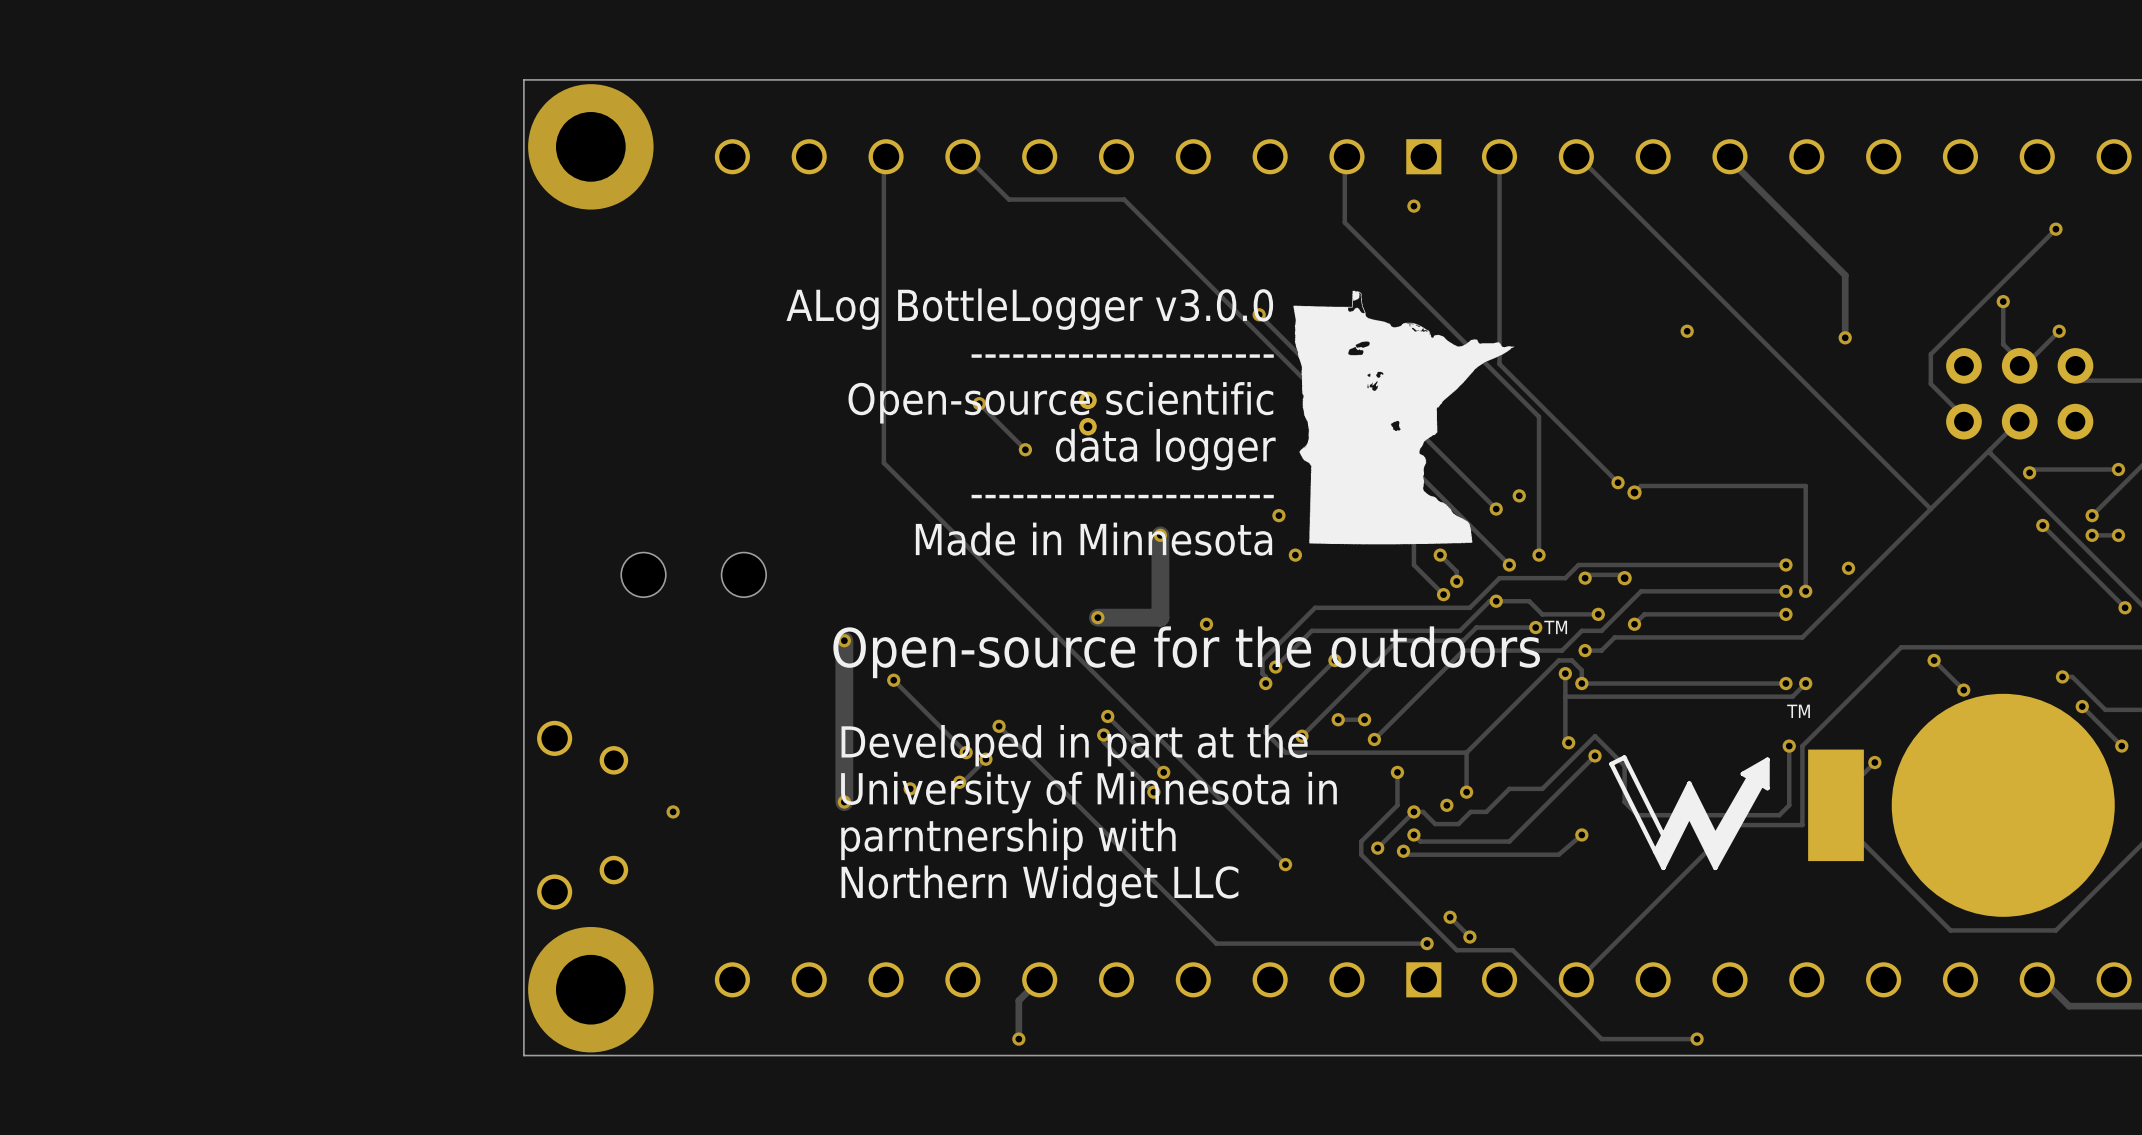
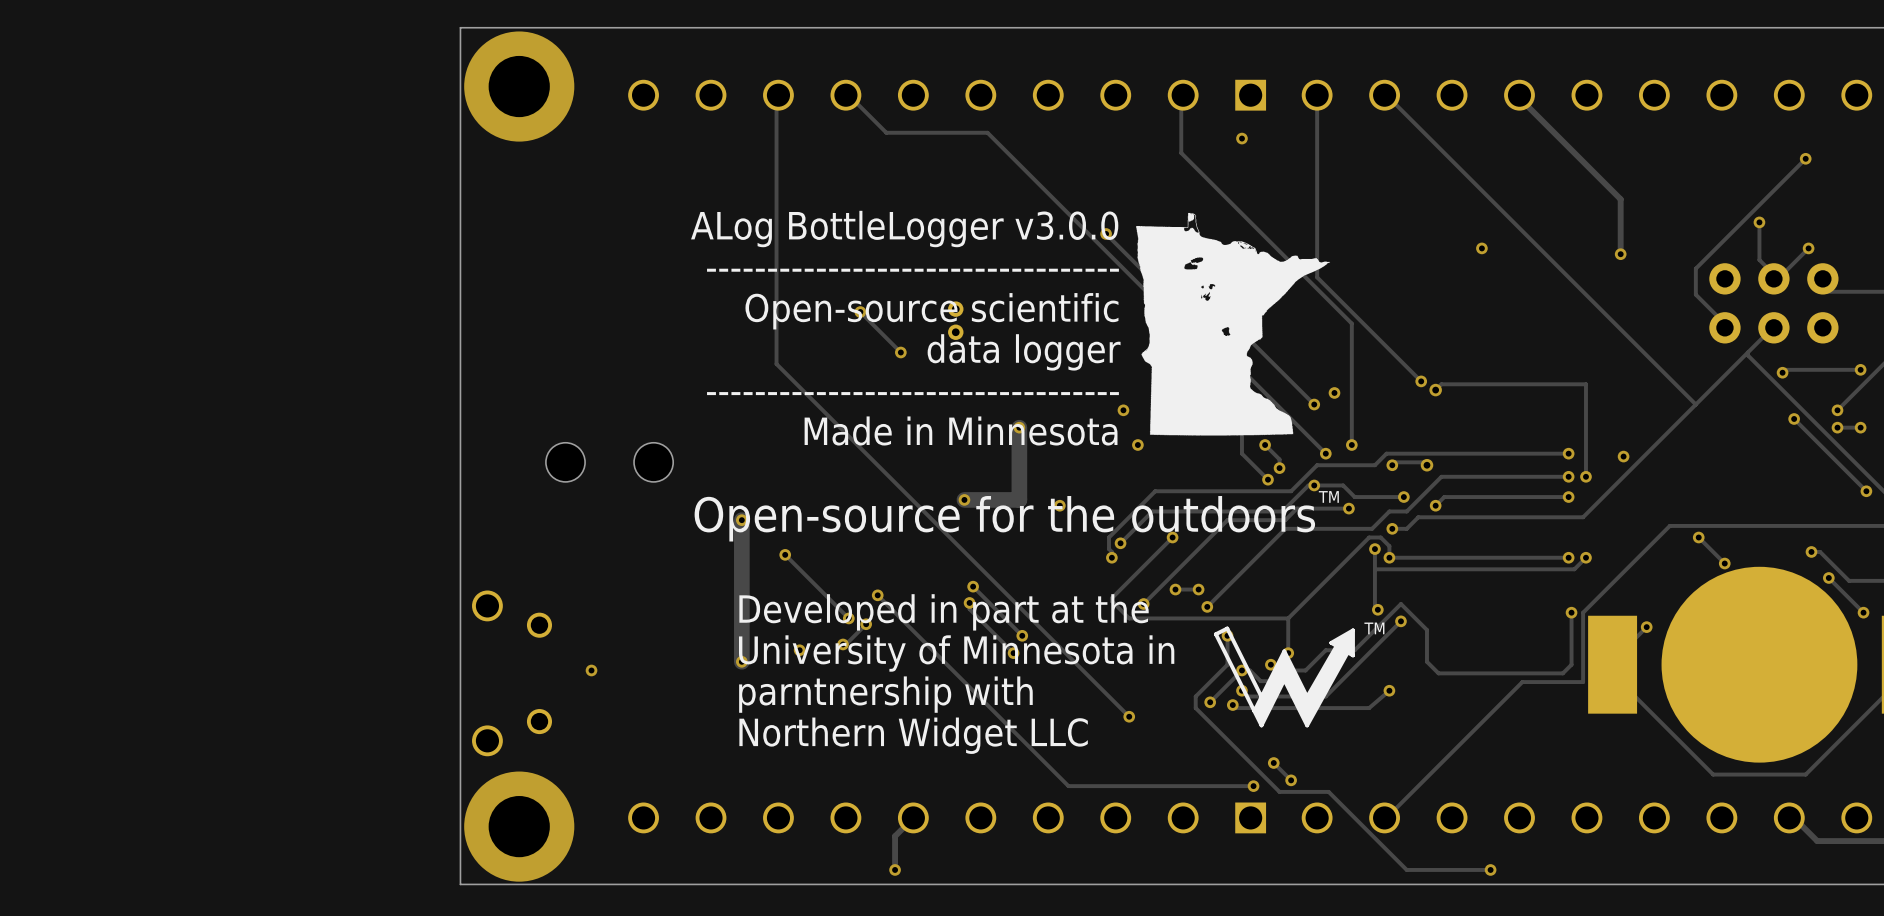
text: ---------------------- (1122, 356) -> ---------------------------------- (912, 270)
text: ---------------------- (1122, 496) -> ---------------------------------- (912, 393)
text position: TM (1555, 627) -> TM (1328, 496)
text position: Open-source for the outdoors (1186, 652) -> Open-source for the outdoors (1004, 518)
text: TM (1798, 711) -> none
drawing: [1609, 755, 1770, 871] -> none
drawing: none -> [1213, 626, 1355, 728]
text: none -> TM (1374, 628)

